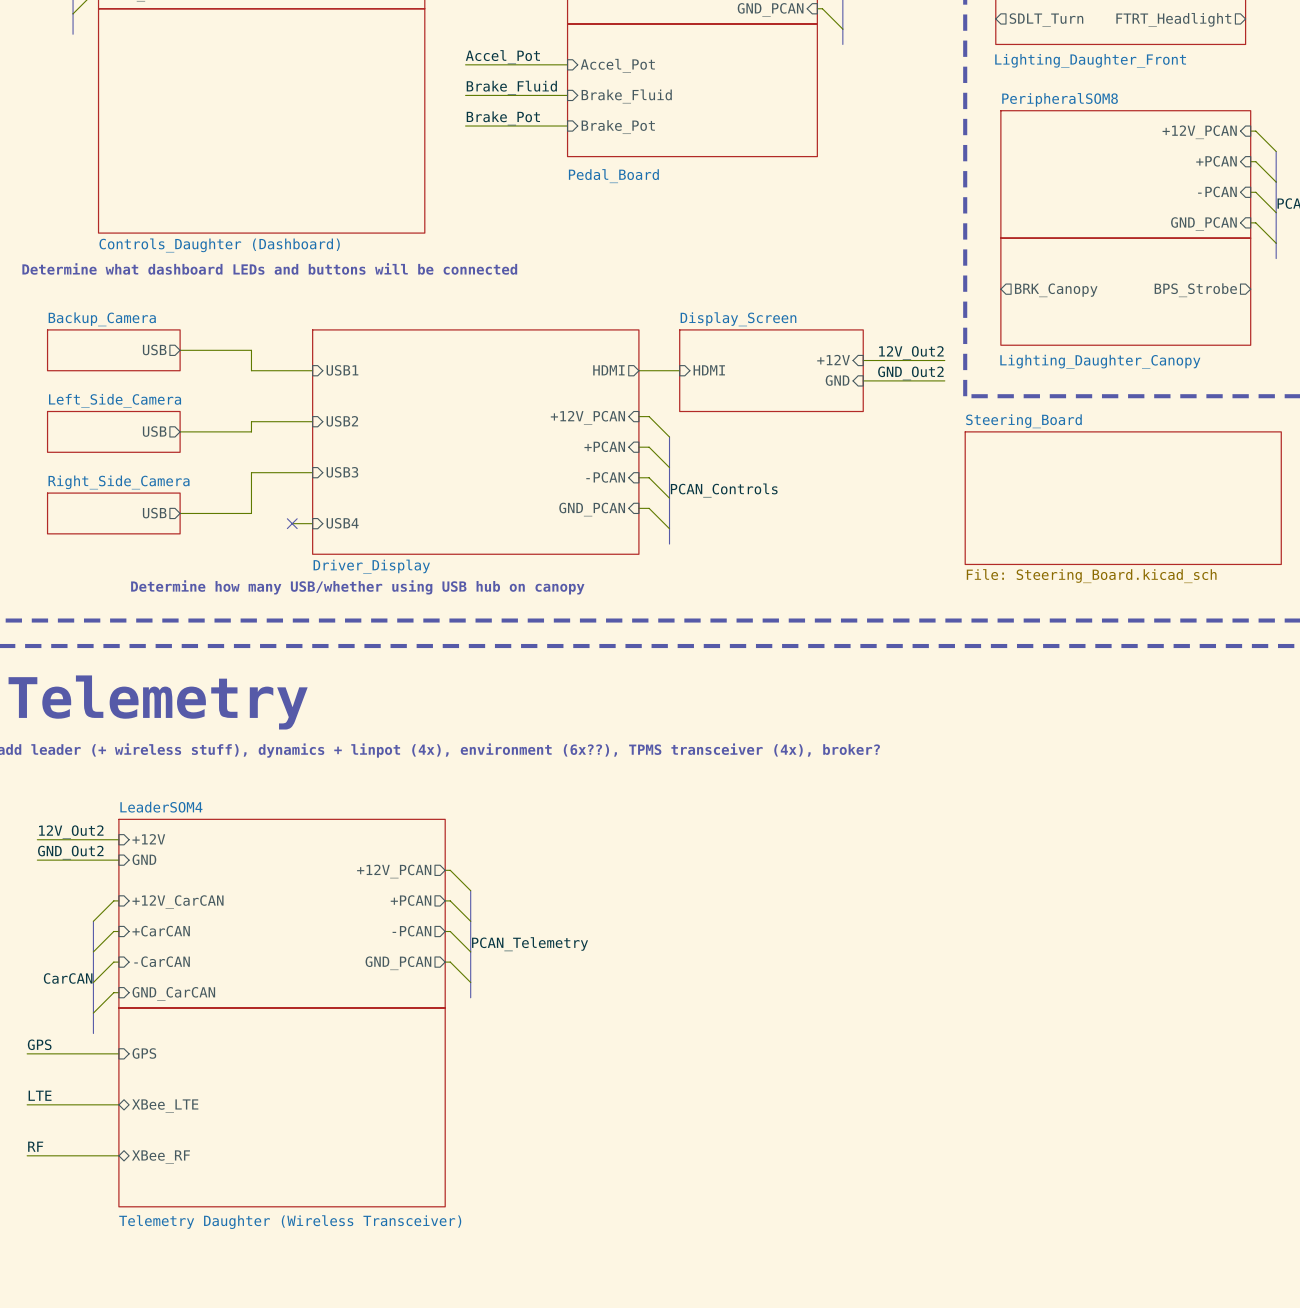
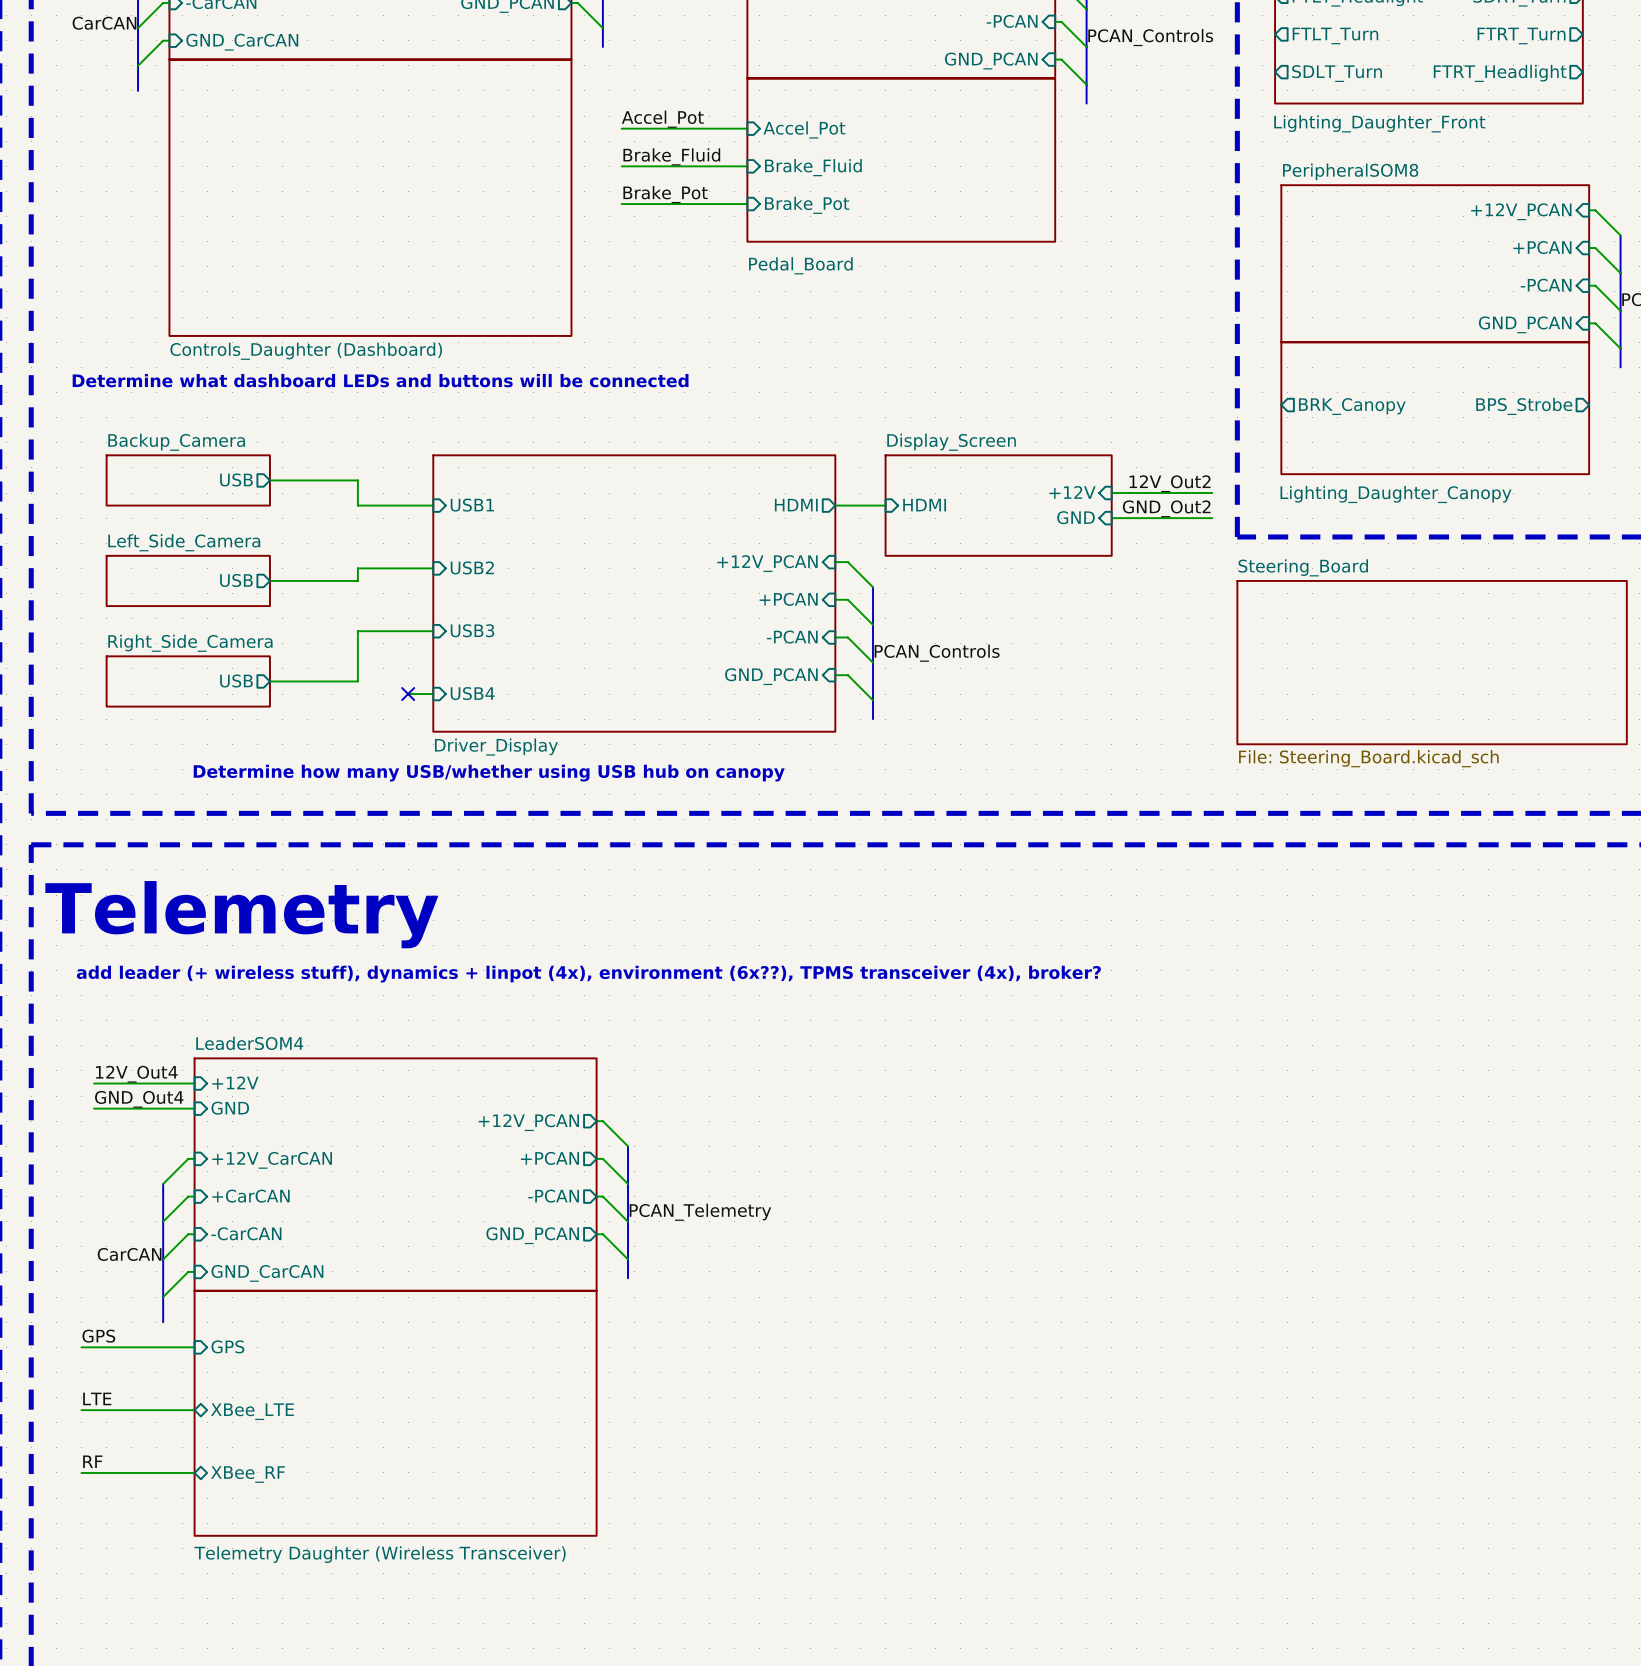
label: 12V_Out2 (71, 832) -> 12V_Out4 (136, 1074)
label: GND_Out2 (70, 852) -> GND_Out4 (139, 1099)

